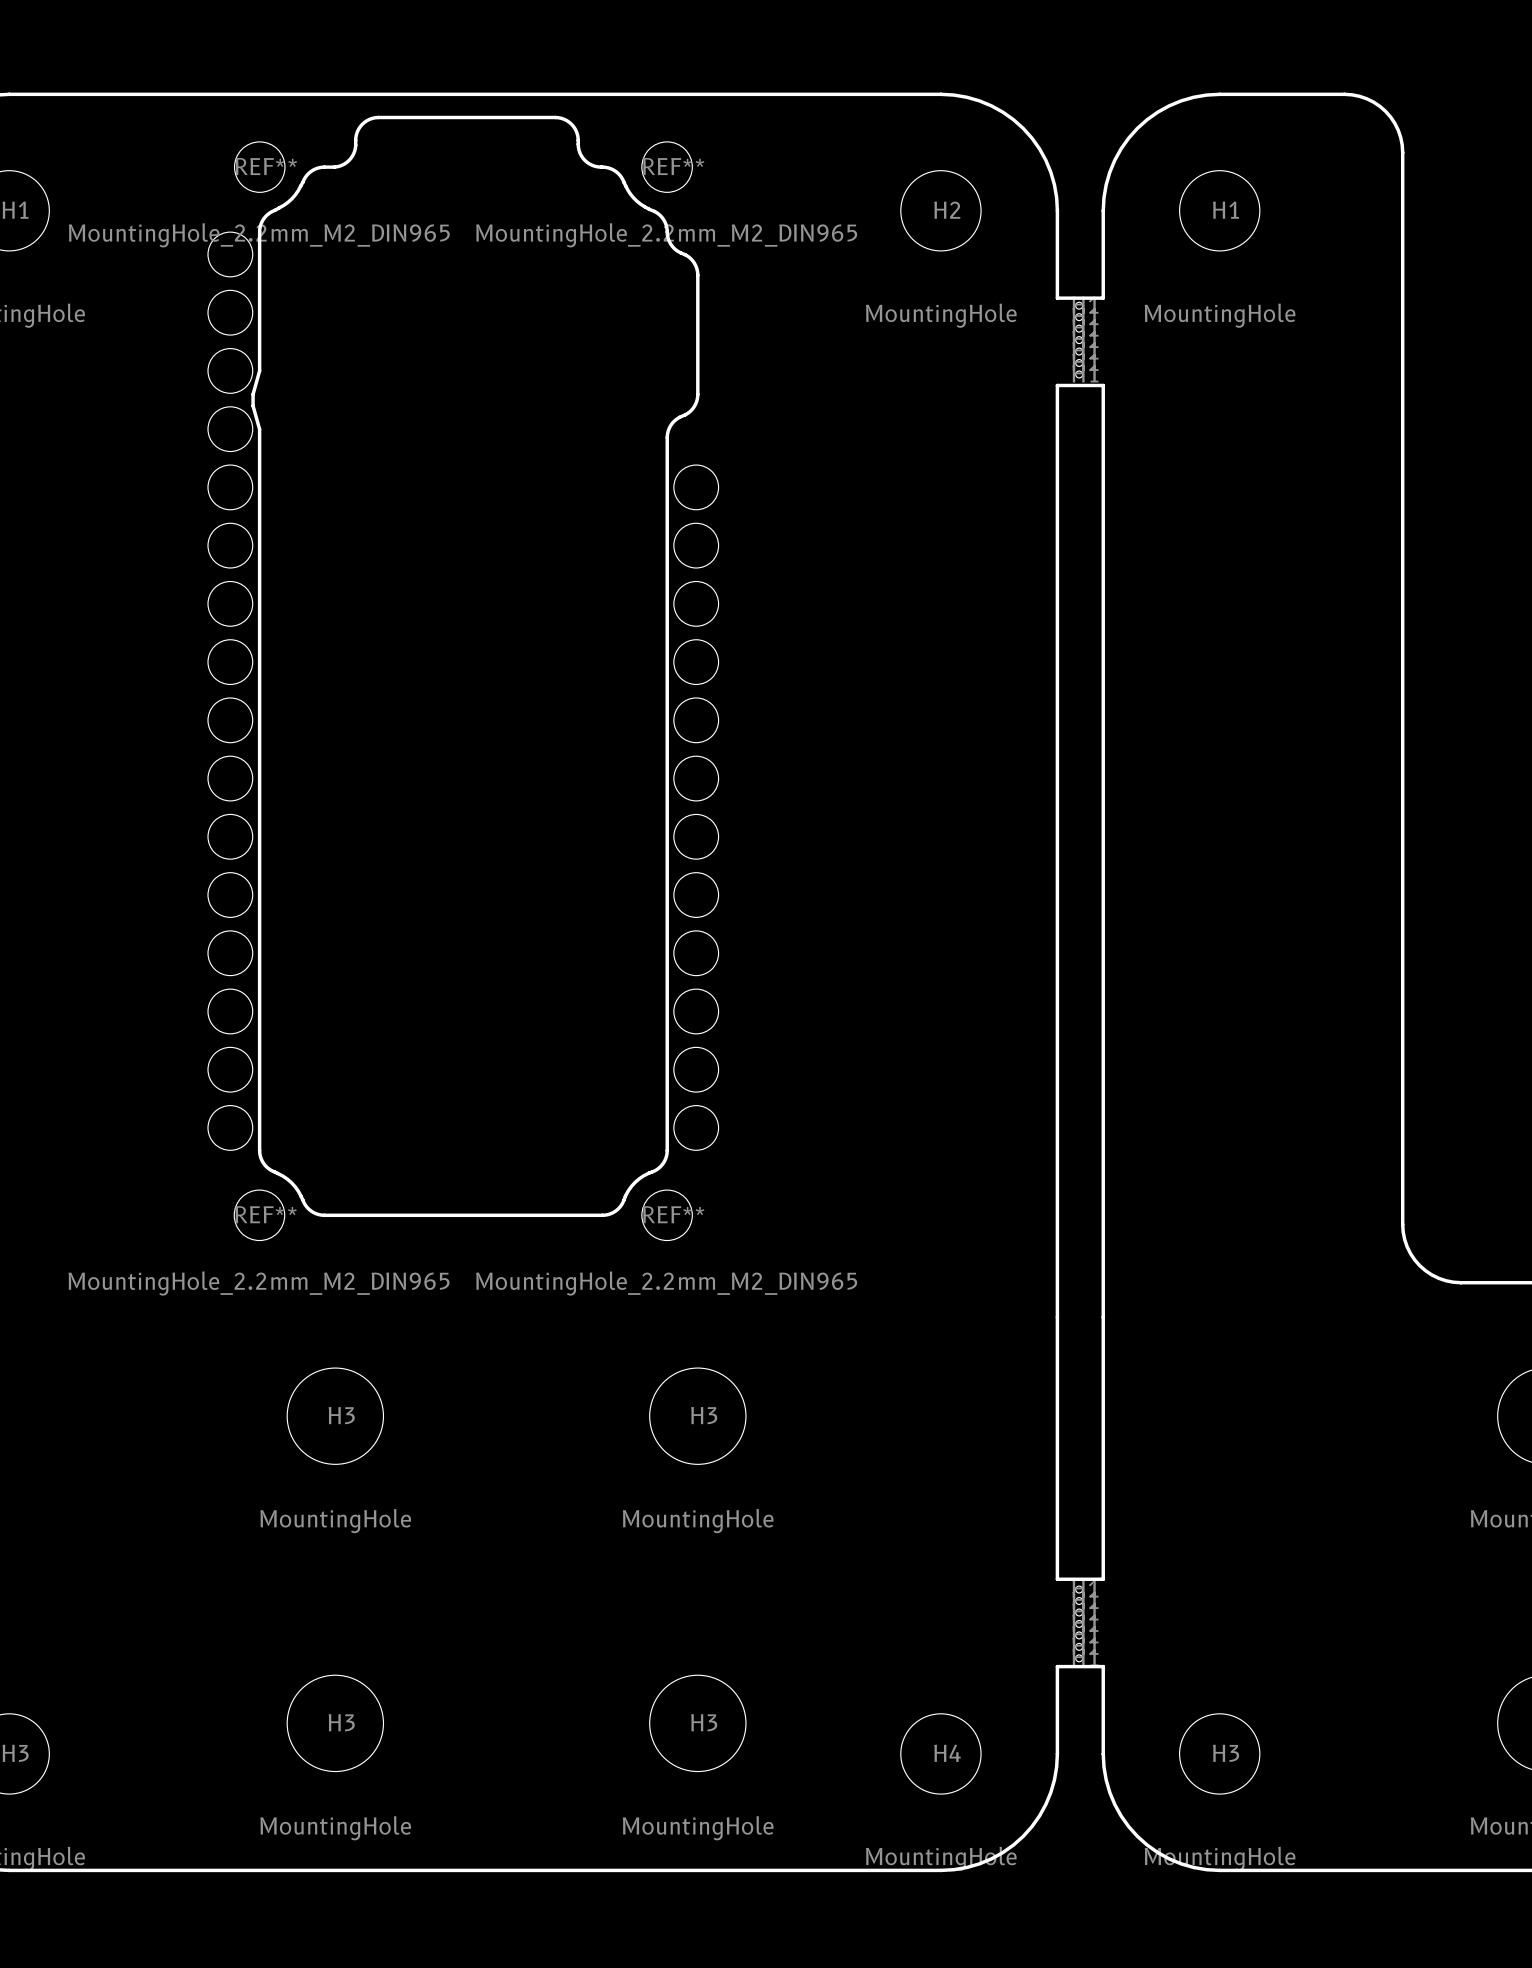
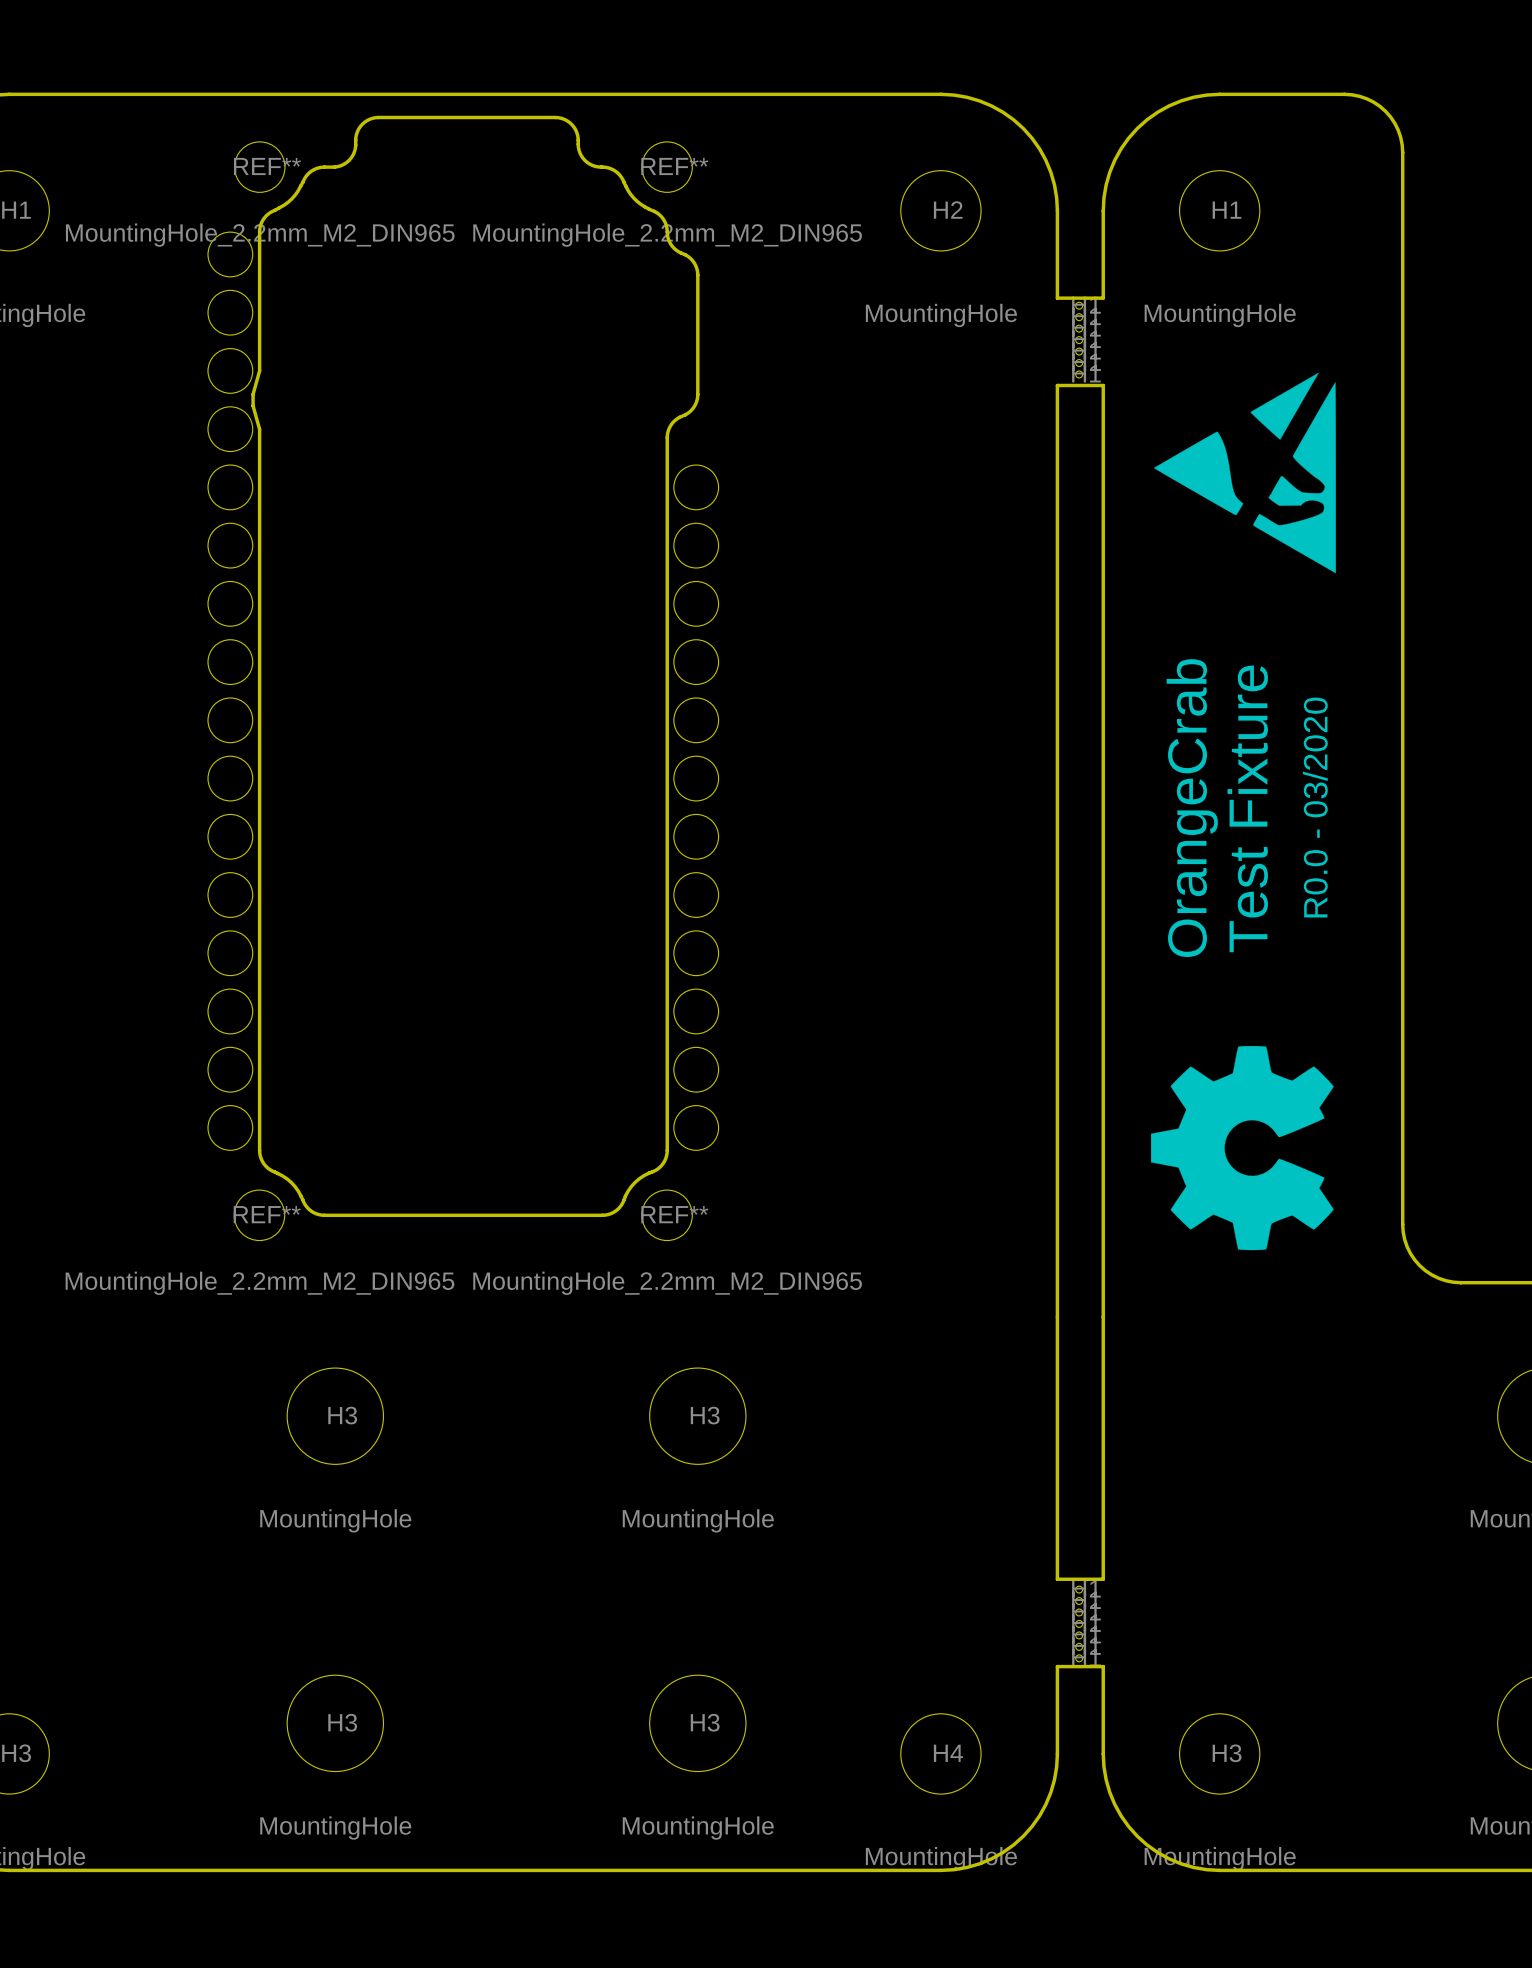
drawing: none -> [1154, 372, 1336, 574]
text: none -> OrangeCrab (1192, 808)
text: none -> Test Fixture (1247, 808)
text: none -> R0.0 - 03/2020 (1315, 807)
drawing: none -> [1150, 1045, 1334, 1251]

